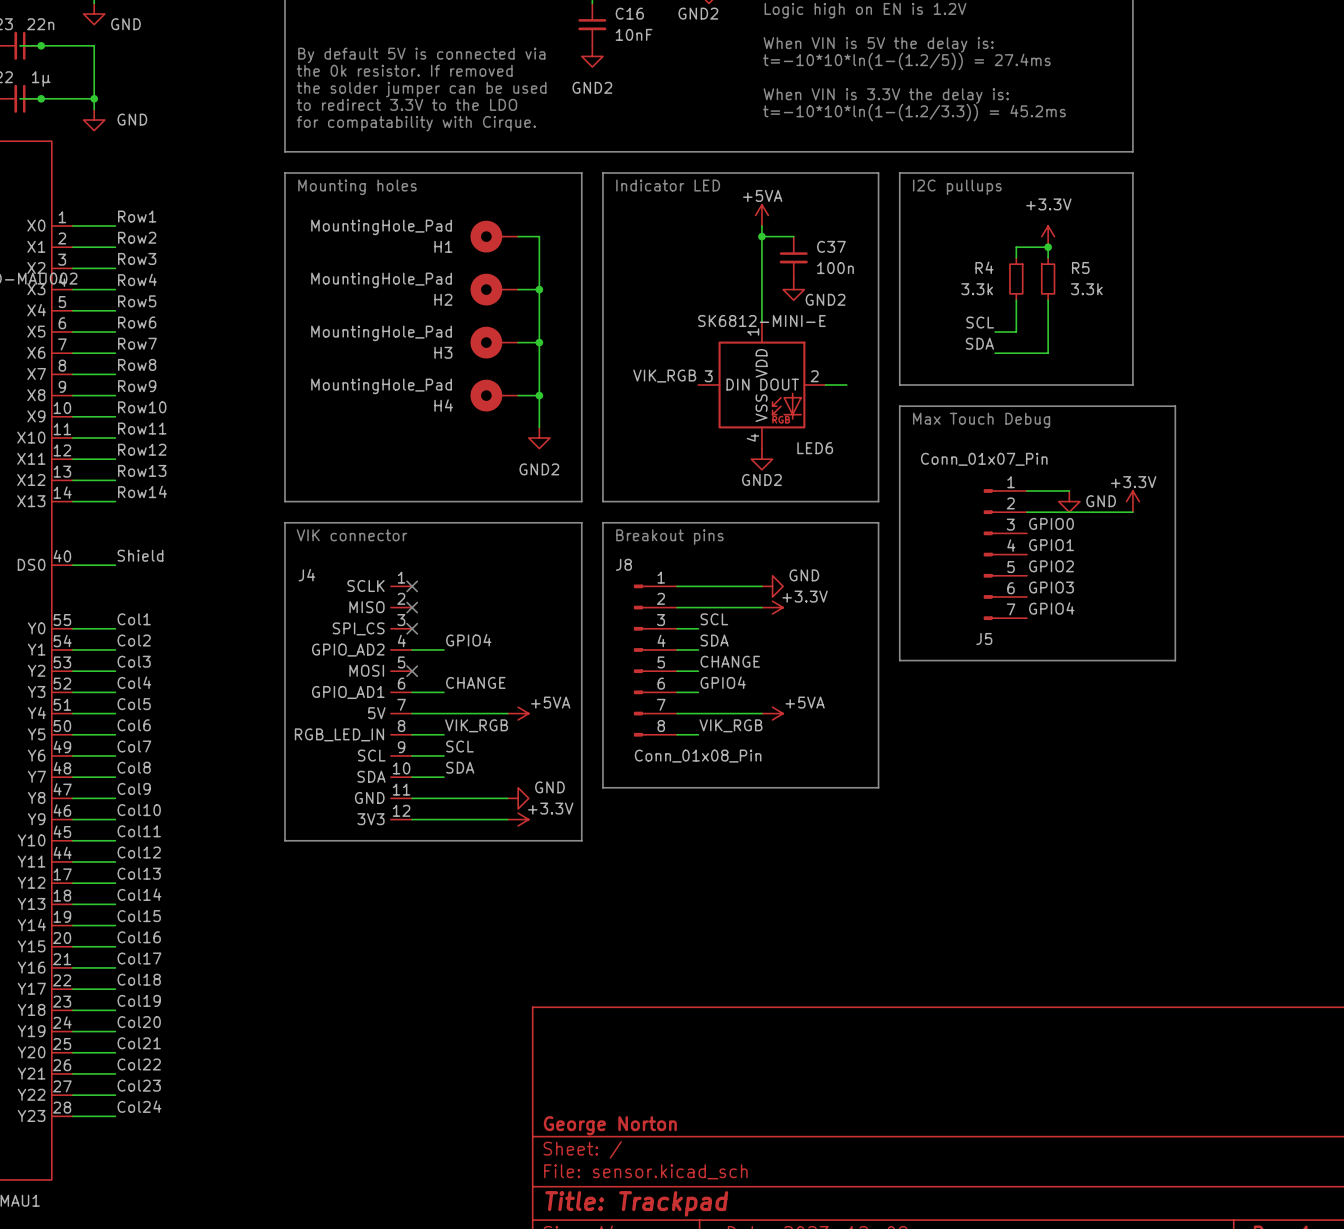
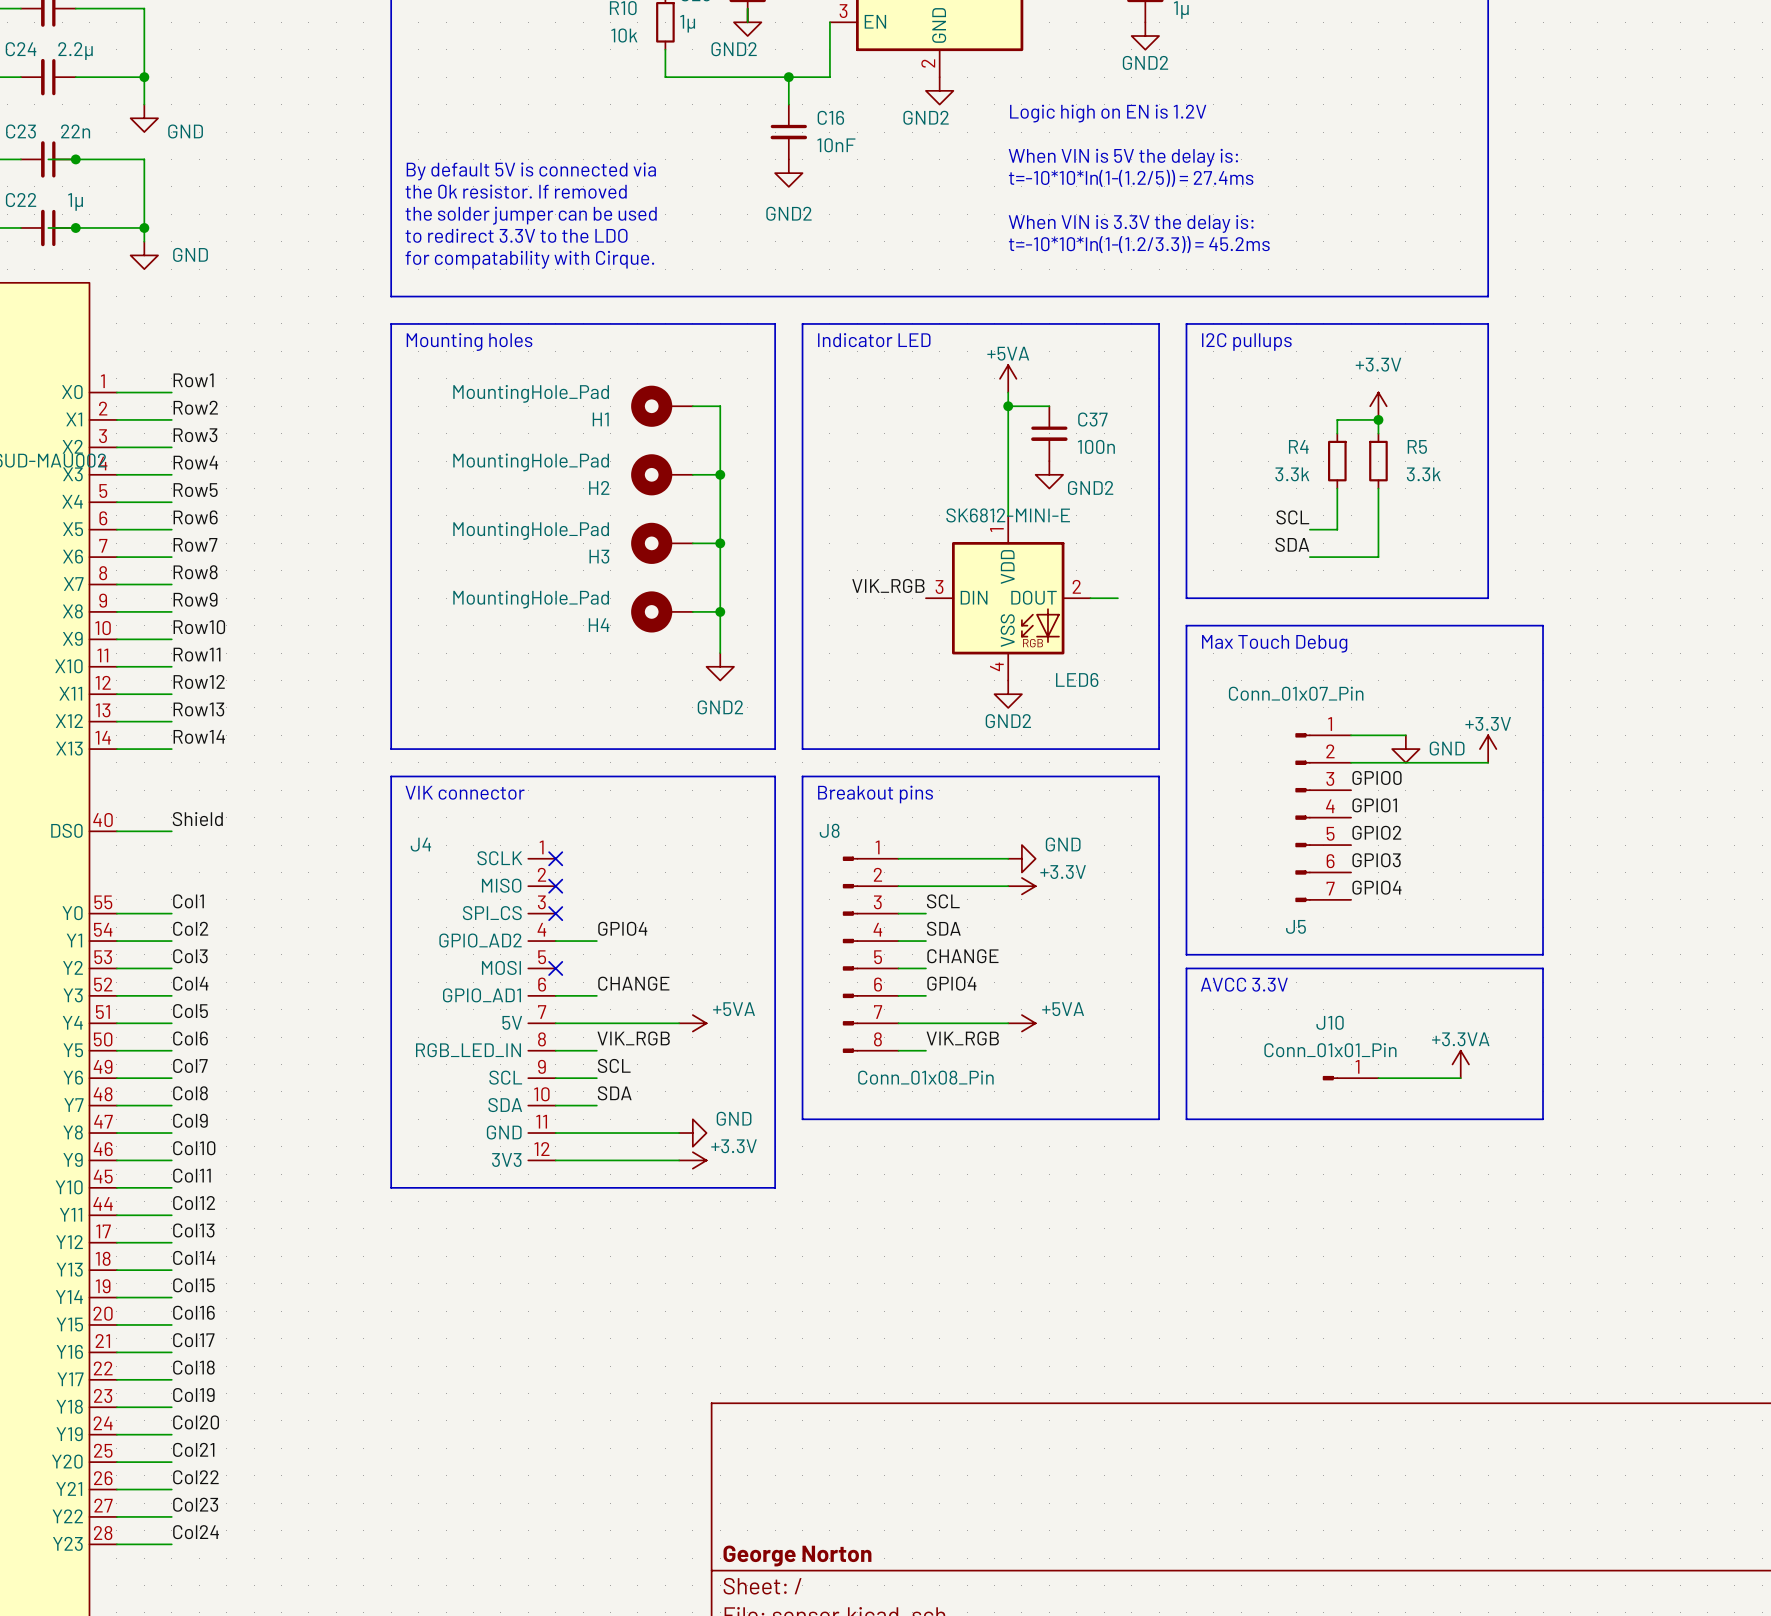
line: none -> (1186, 968) (1543, 968) (1543, 1119) (1186, 1119) (1186, 968)
text: none -> AVCC 3.3V (1244, 984)
power symbol: none -> +3.3VA (1460, 1064)
J10: none -> Conn_01x01_Pin (1350, 1078)
wire: none -> (1378, 1078) (1460, 1078)

